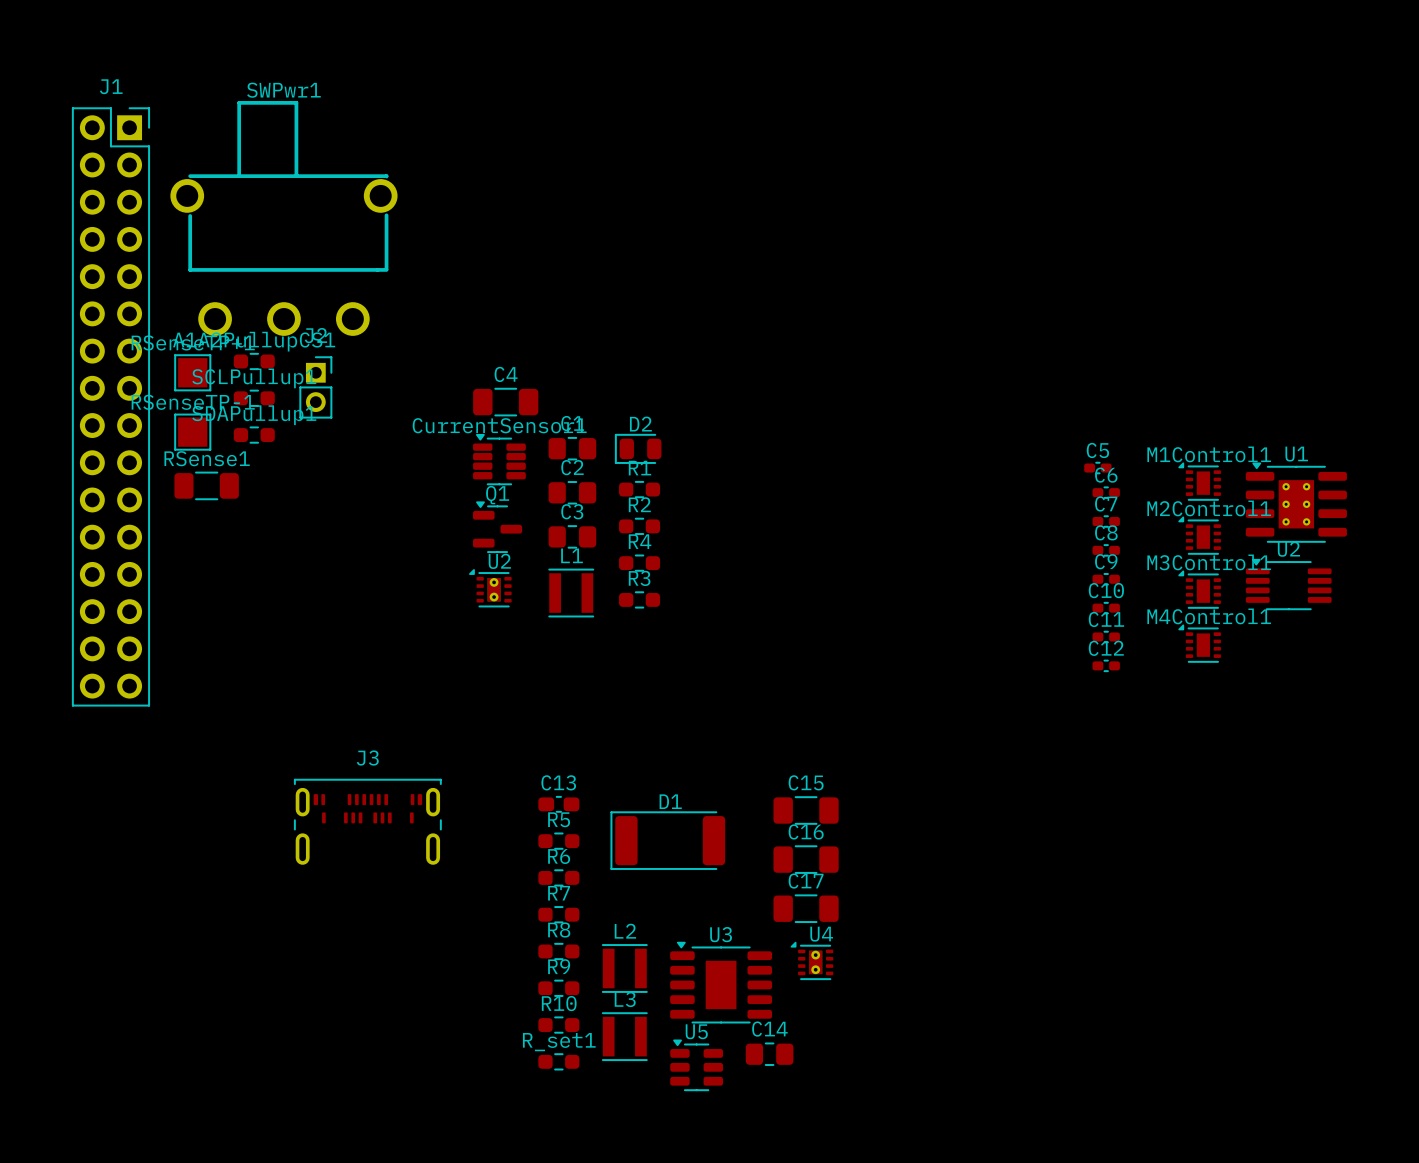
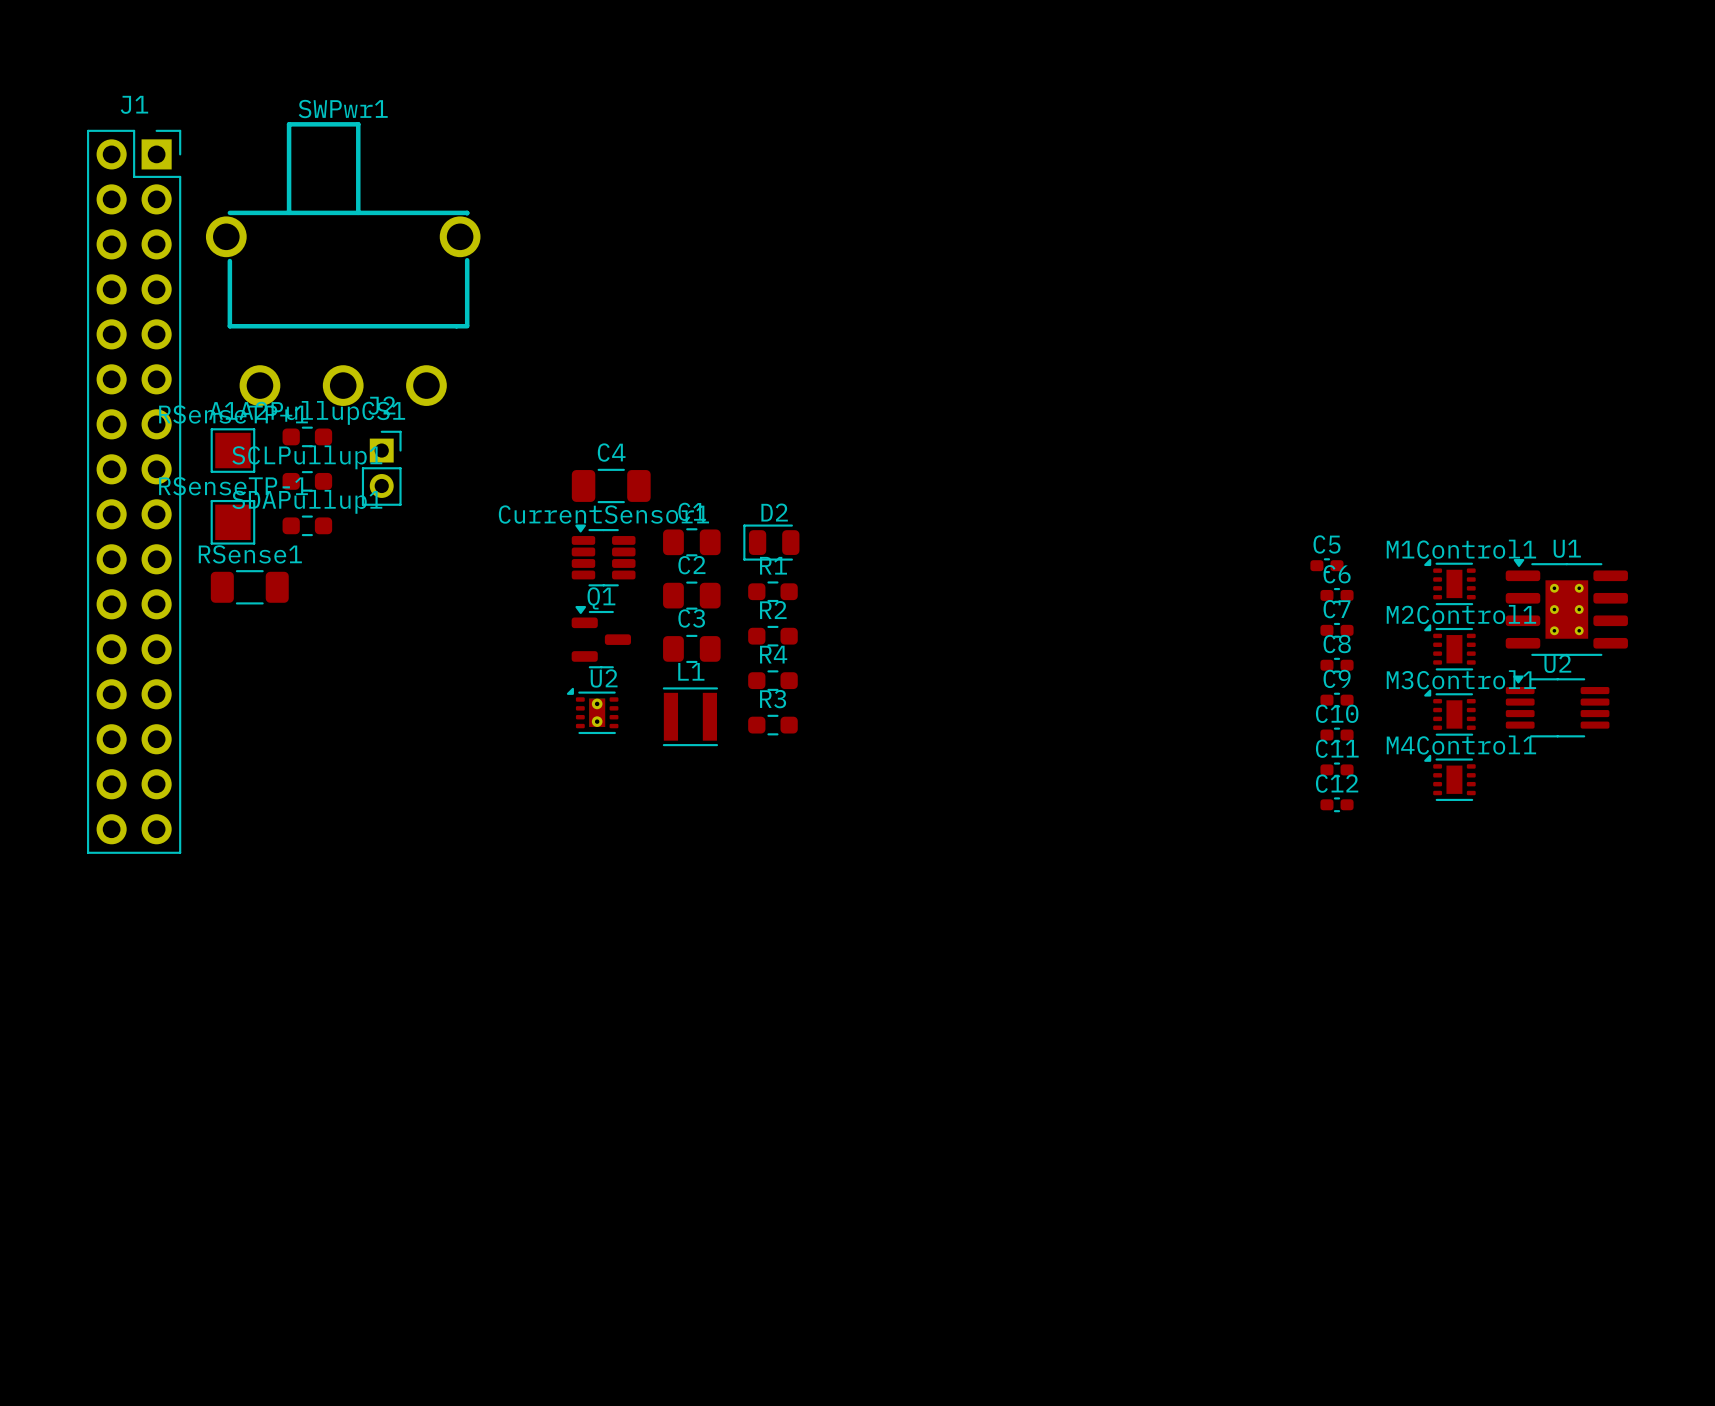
C13: (558, 804) -> none
C15: (806, 810) -> none
J3: (367, 821) -> none
D1: (667, 840) -> none
R5: (558, 841) -> none
C16: (806, 859) -> none
R6: (558, 877) -> none
C17: (806, 908) -> none
R7: (558, 914) -> none
R8: (558, 951) -> none
U4: (811, 960) -> none
L2: (624, 968) -> none
U3: (721, 982) -> none
R9: (558, 988) -> none
R10: (558, 1025) -> none
L3: (624, 1036) -> none
C14: (769, 1054) -> none
R_set1: (558, 1061) -> none
U5: (696, 1065) -> none

